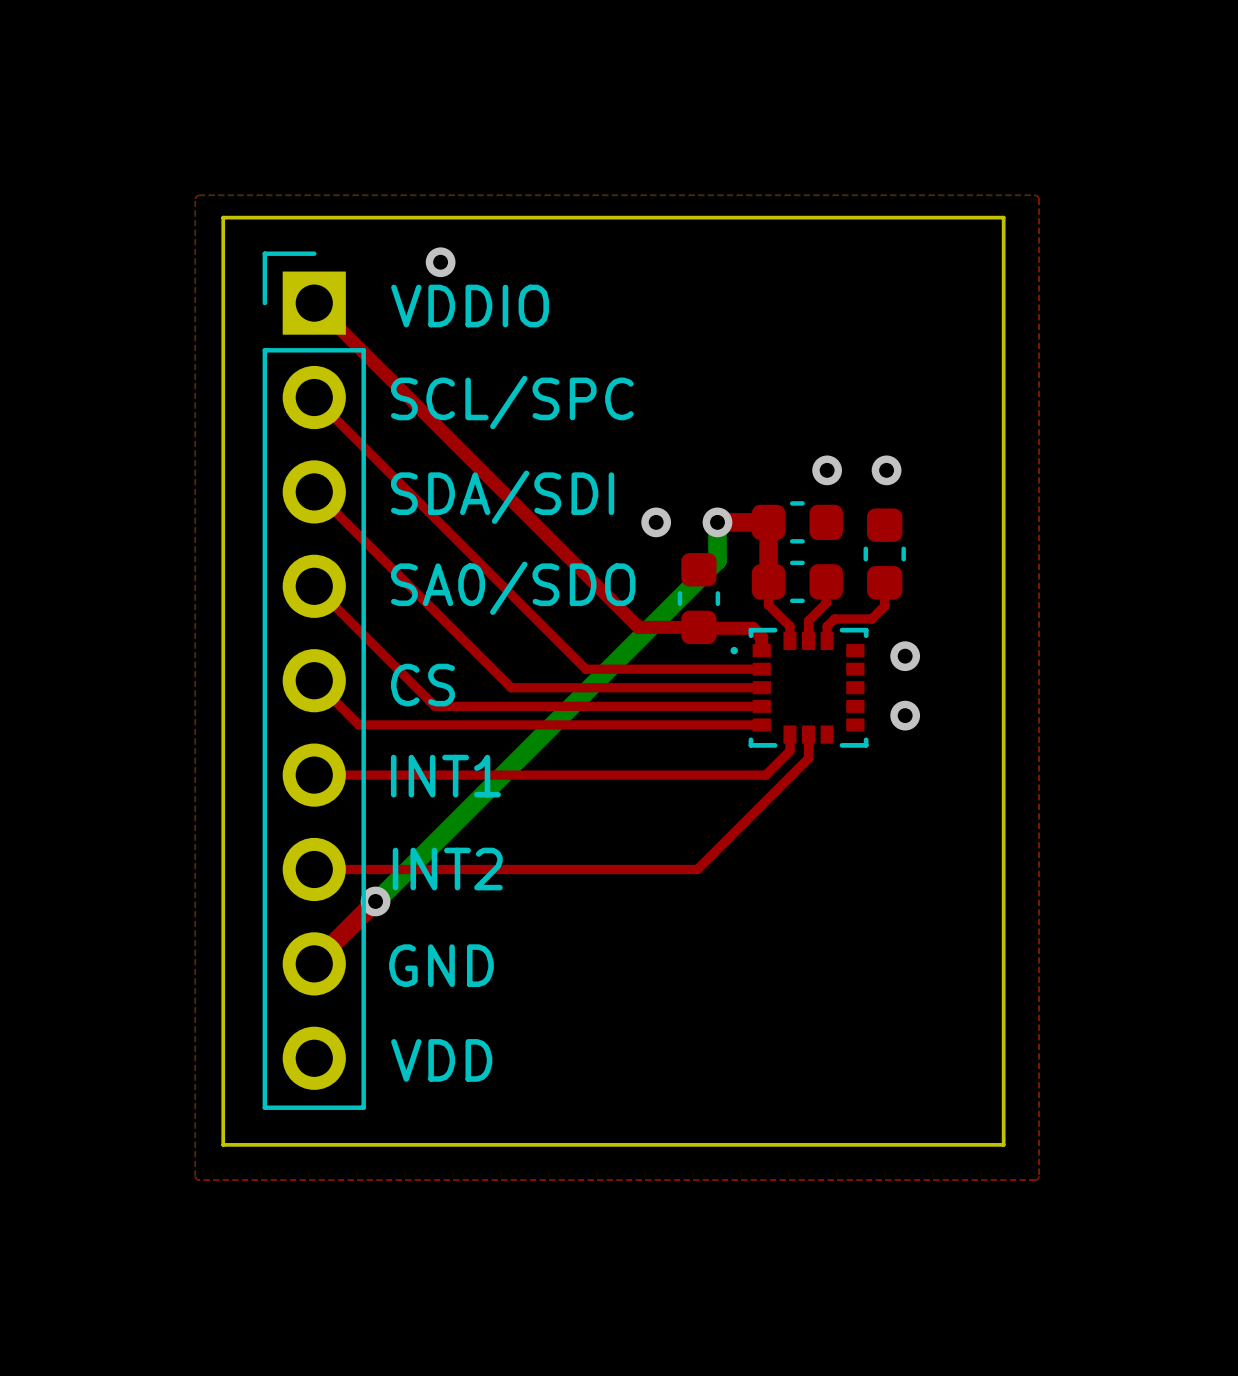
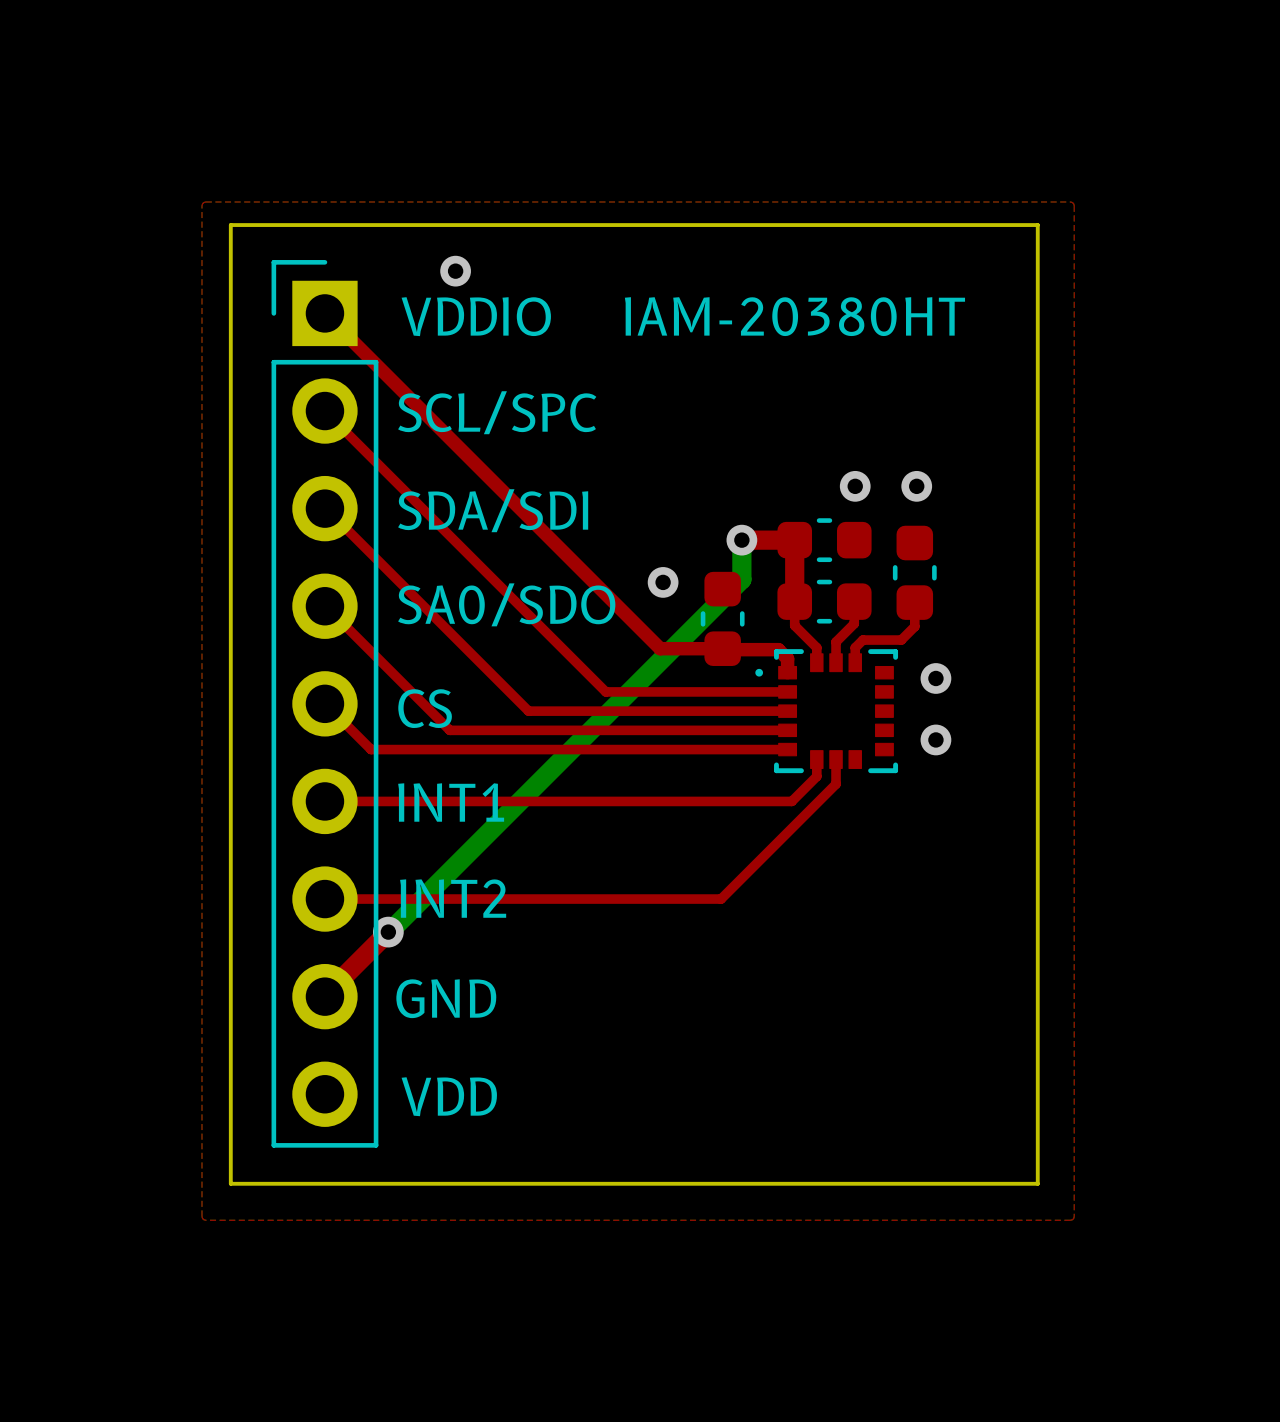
text: none -> IAM-20380HT (794, 316)
via position: (656, 522) -> (663, 582)

